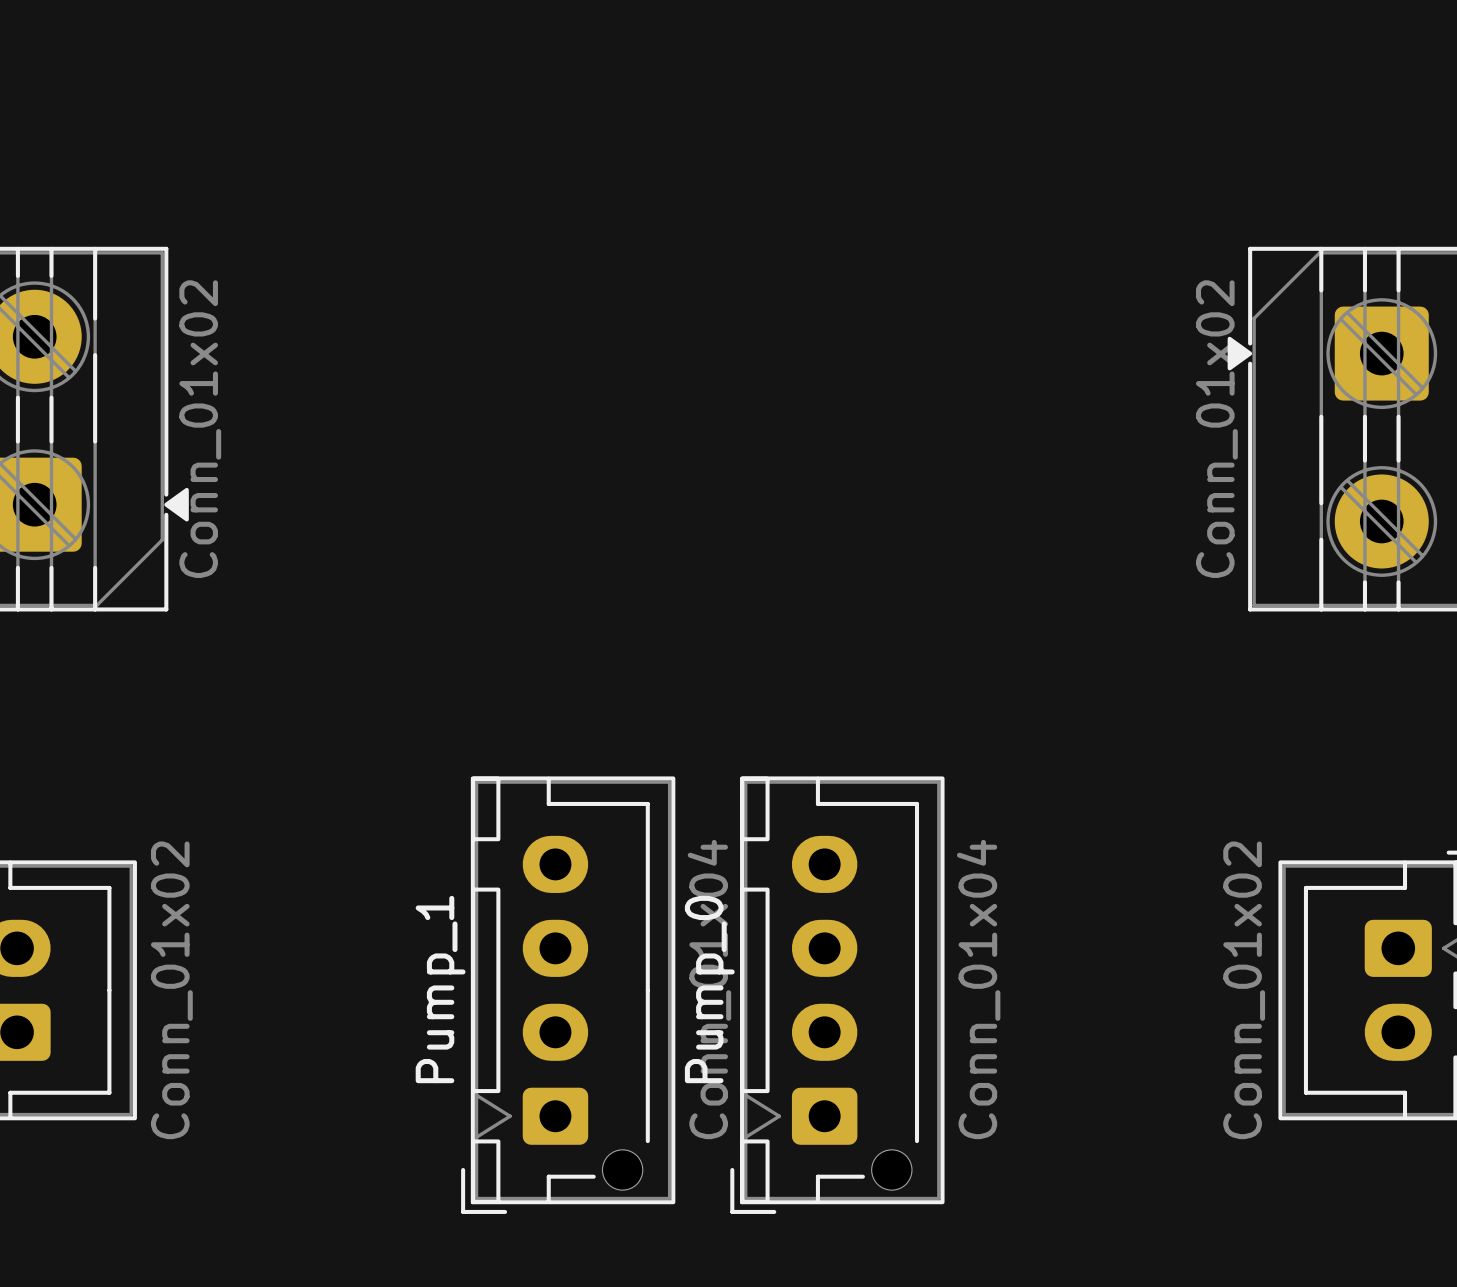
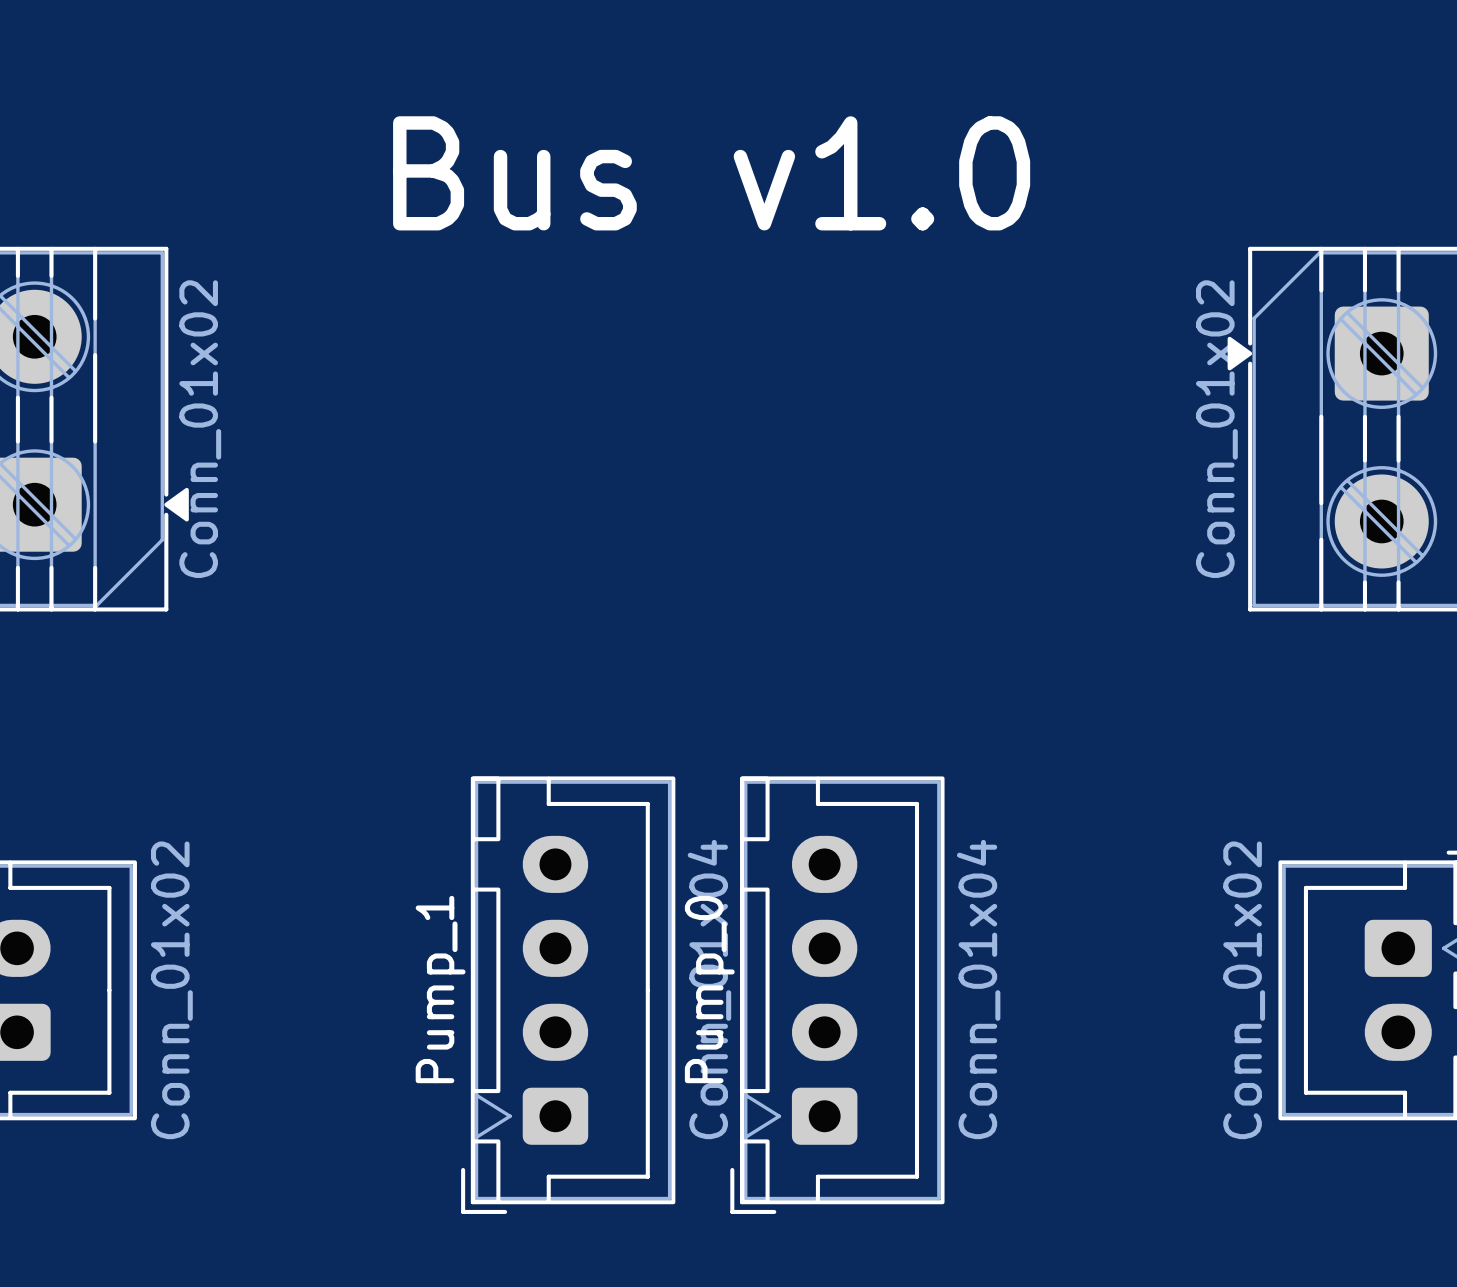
text: none -> Bus v1.0 (711, 173)
Pump_1 footprint: [461, 776, 676, 1214] -> [461, 776, 676, 1214]
Pump_0 footprint: [730, 776, 945, 1214] -> [730, 776, 945, 1214]

